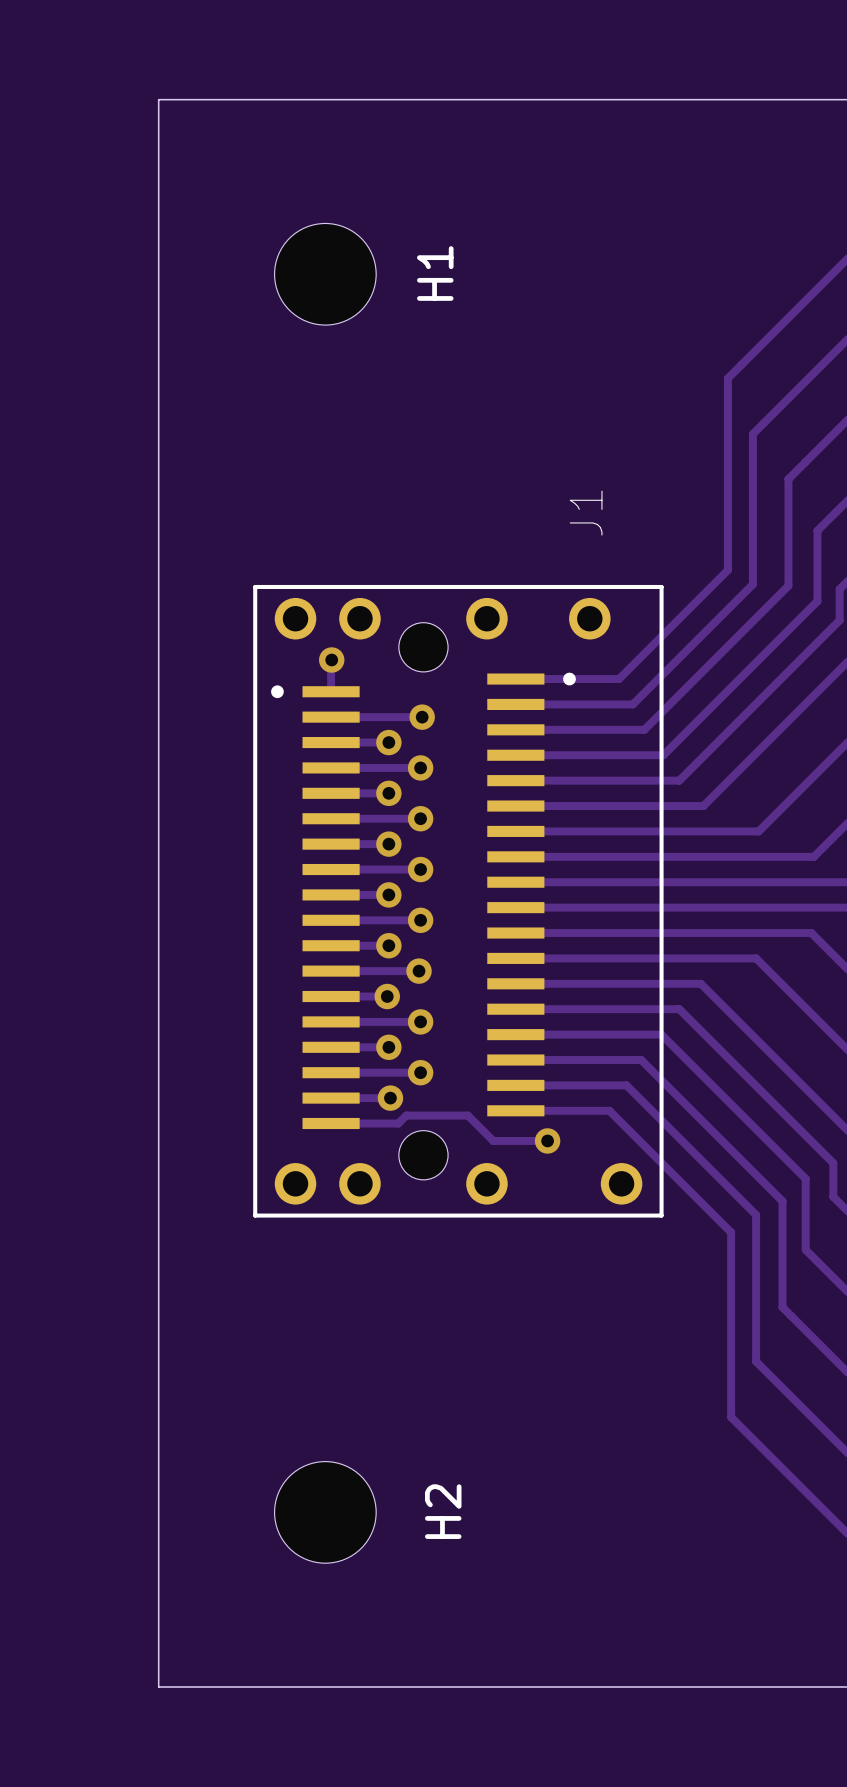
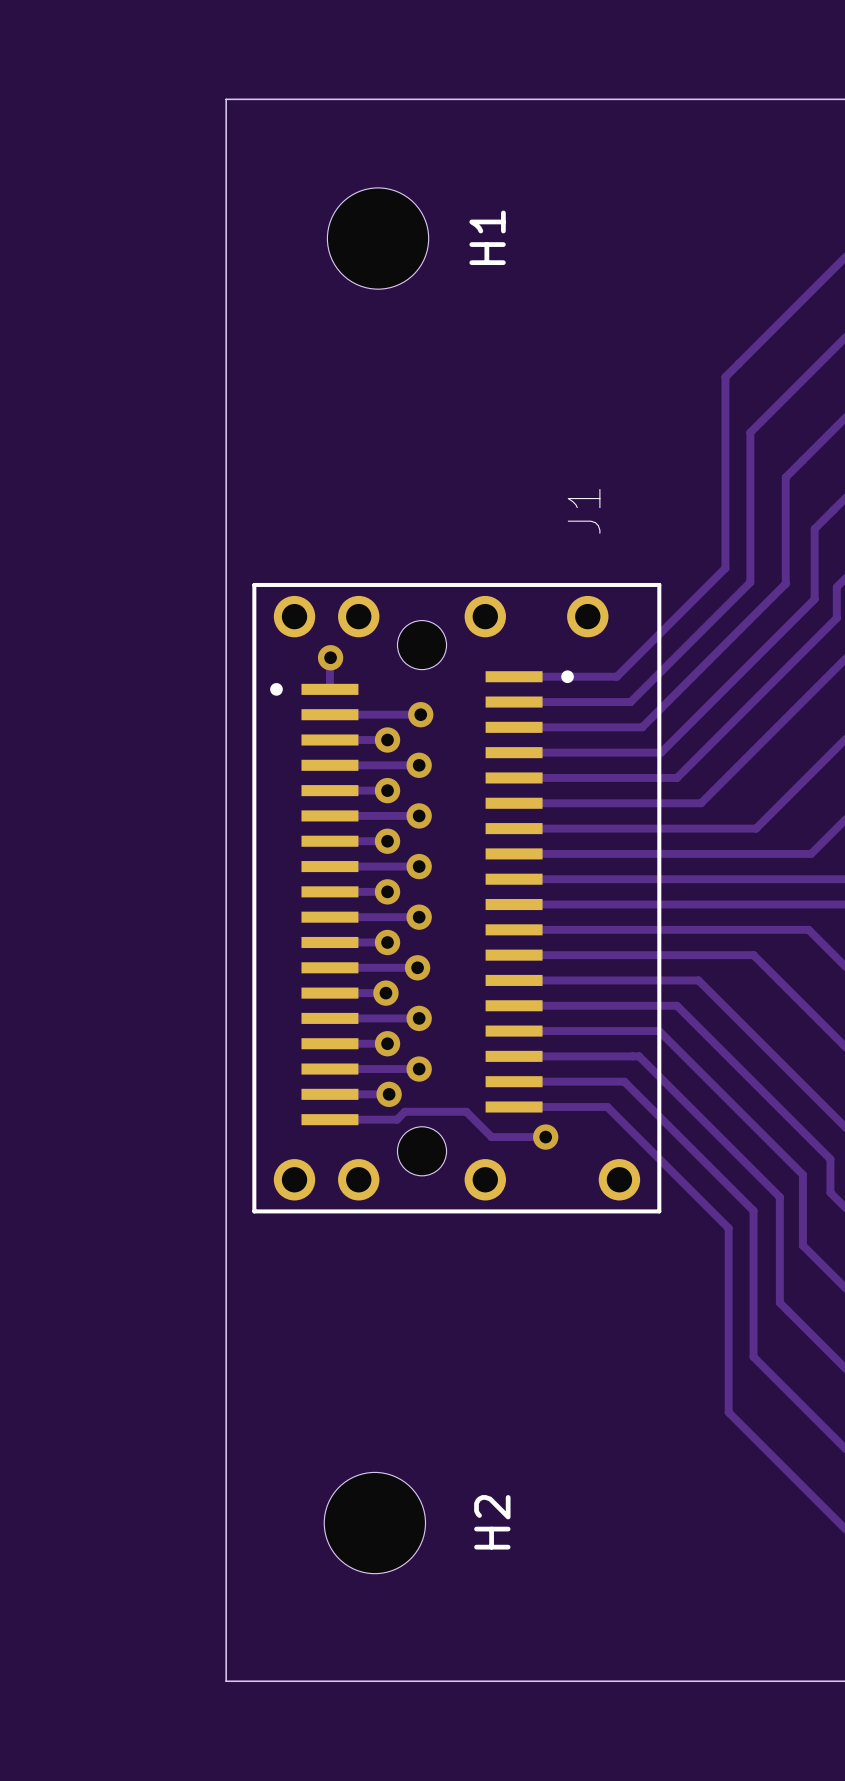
board edge: (226, 99) (158, 99) (158, 1687) (226, 1687) -> (226, 99) (226, 1681)
H1 position: (325, 274) -> (378, 238)
H2 position: (325, 1512) -> (374, 1523)

